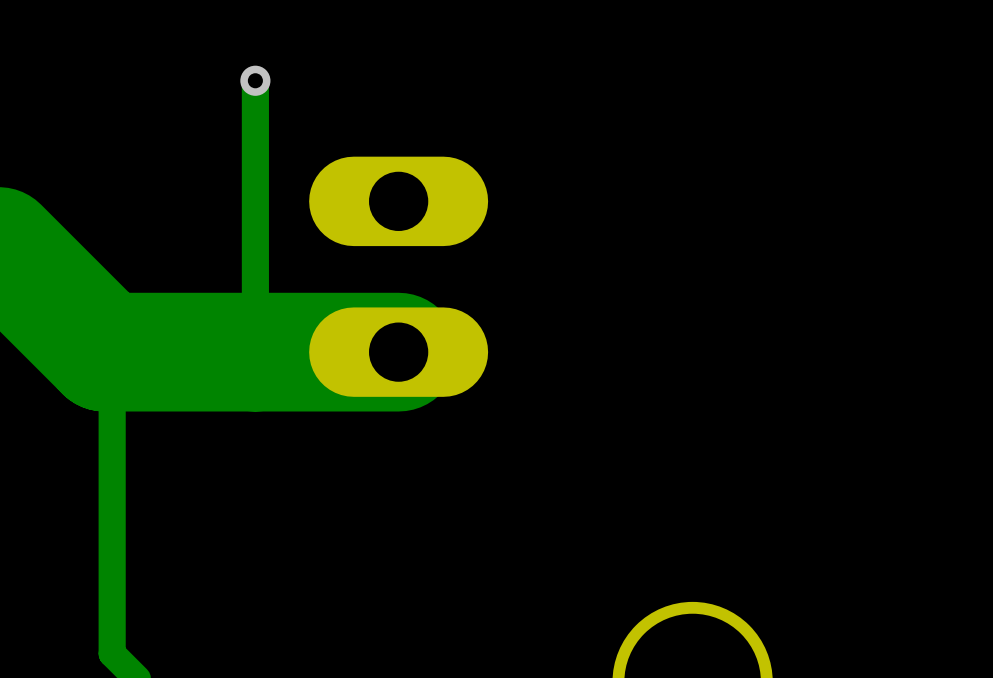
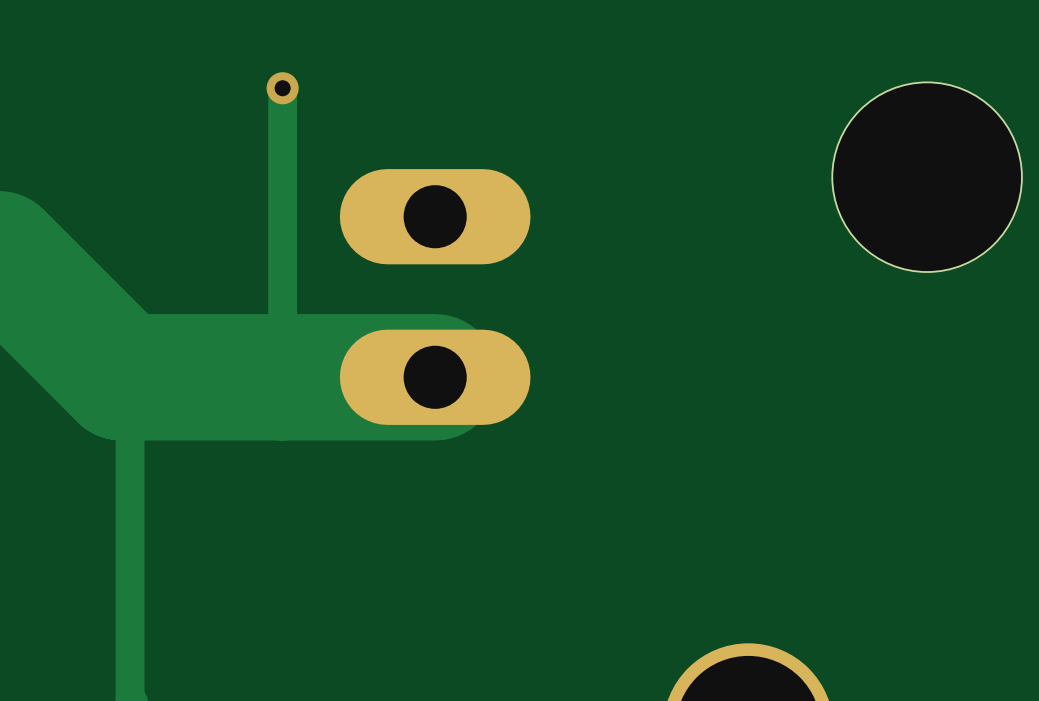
part: none -> (927, 177)

